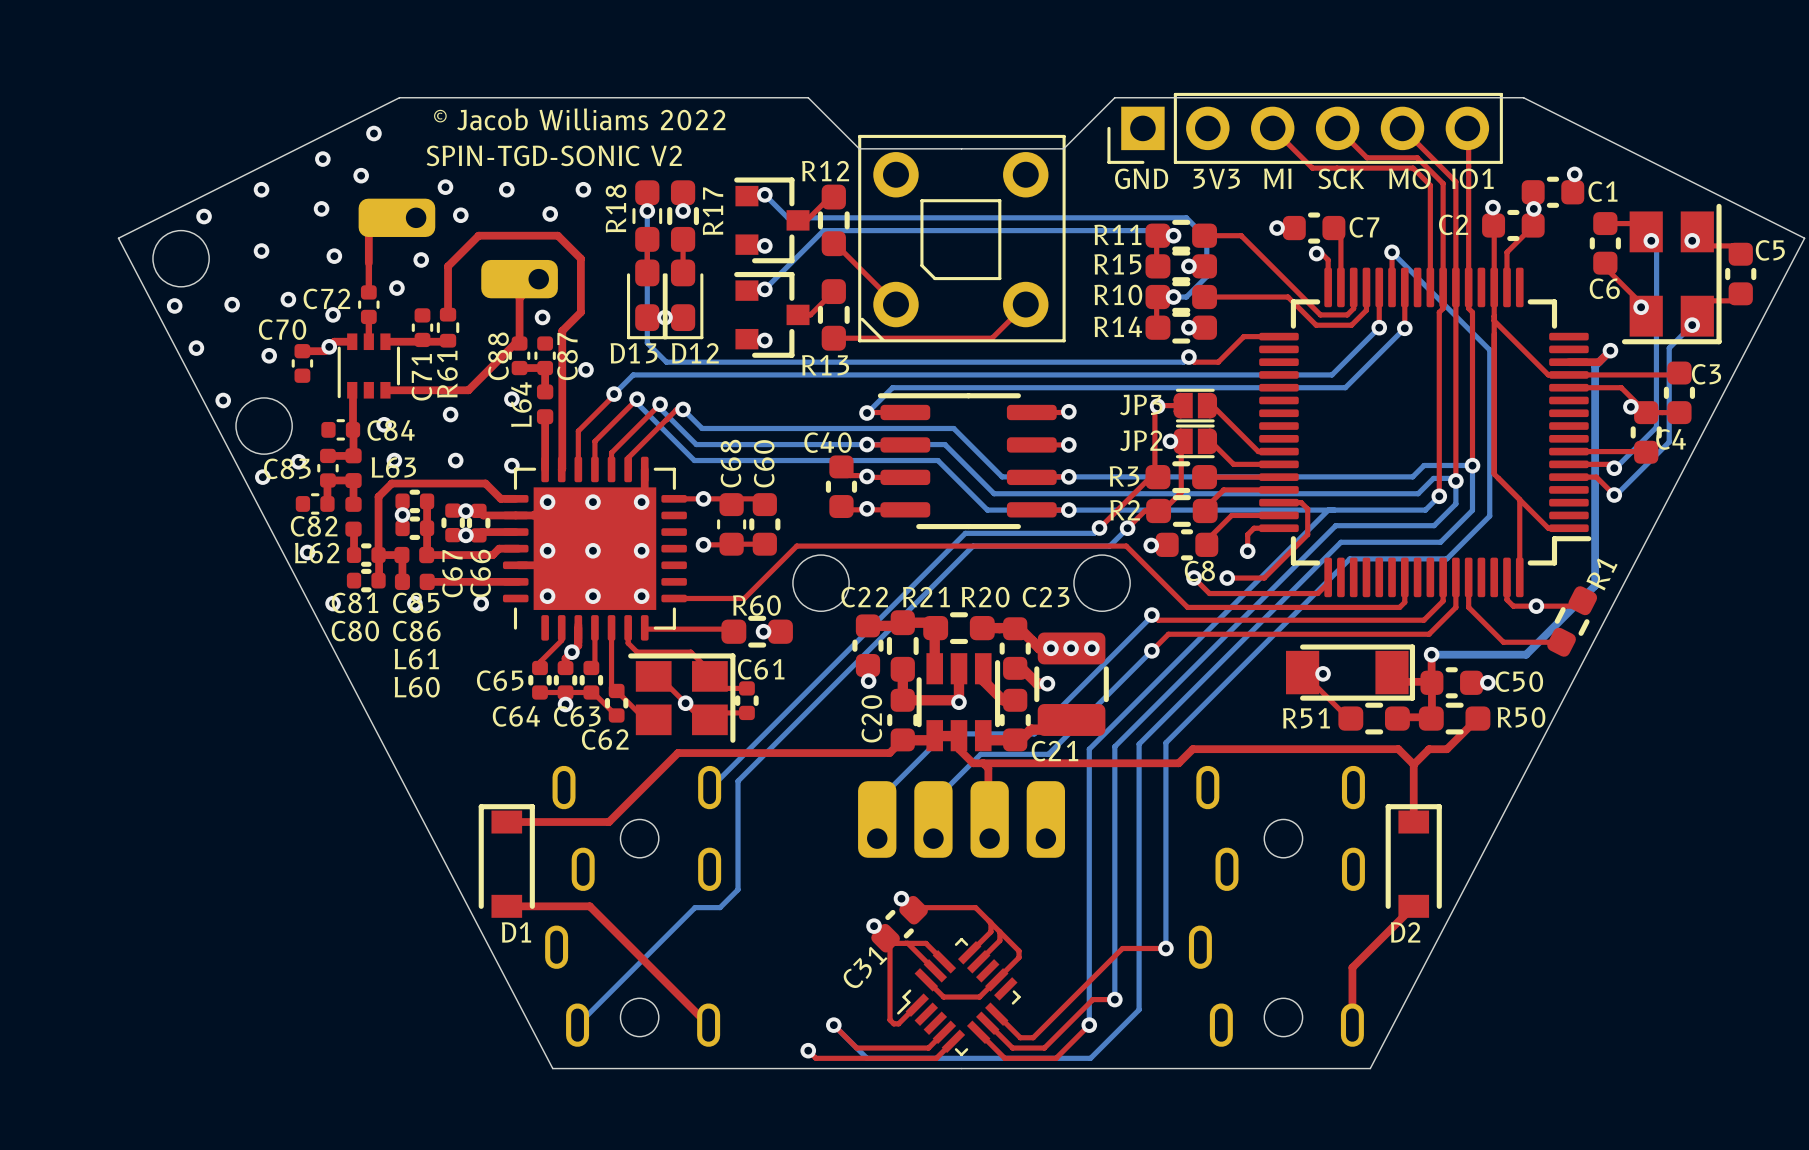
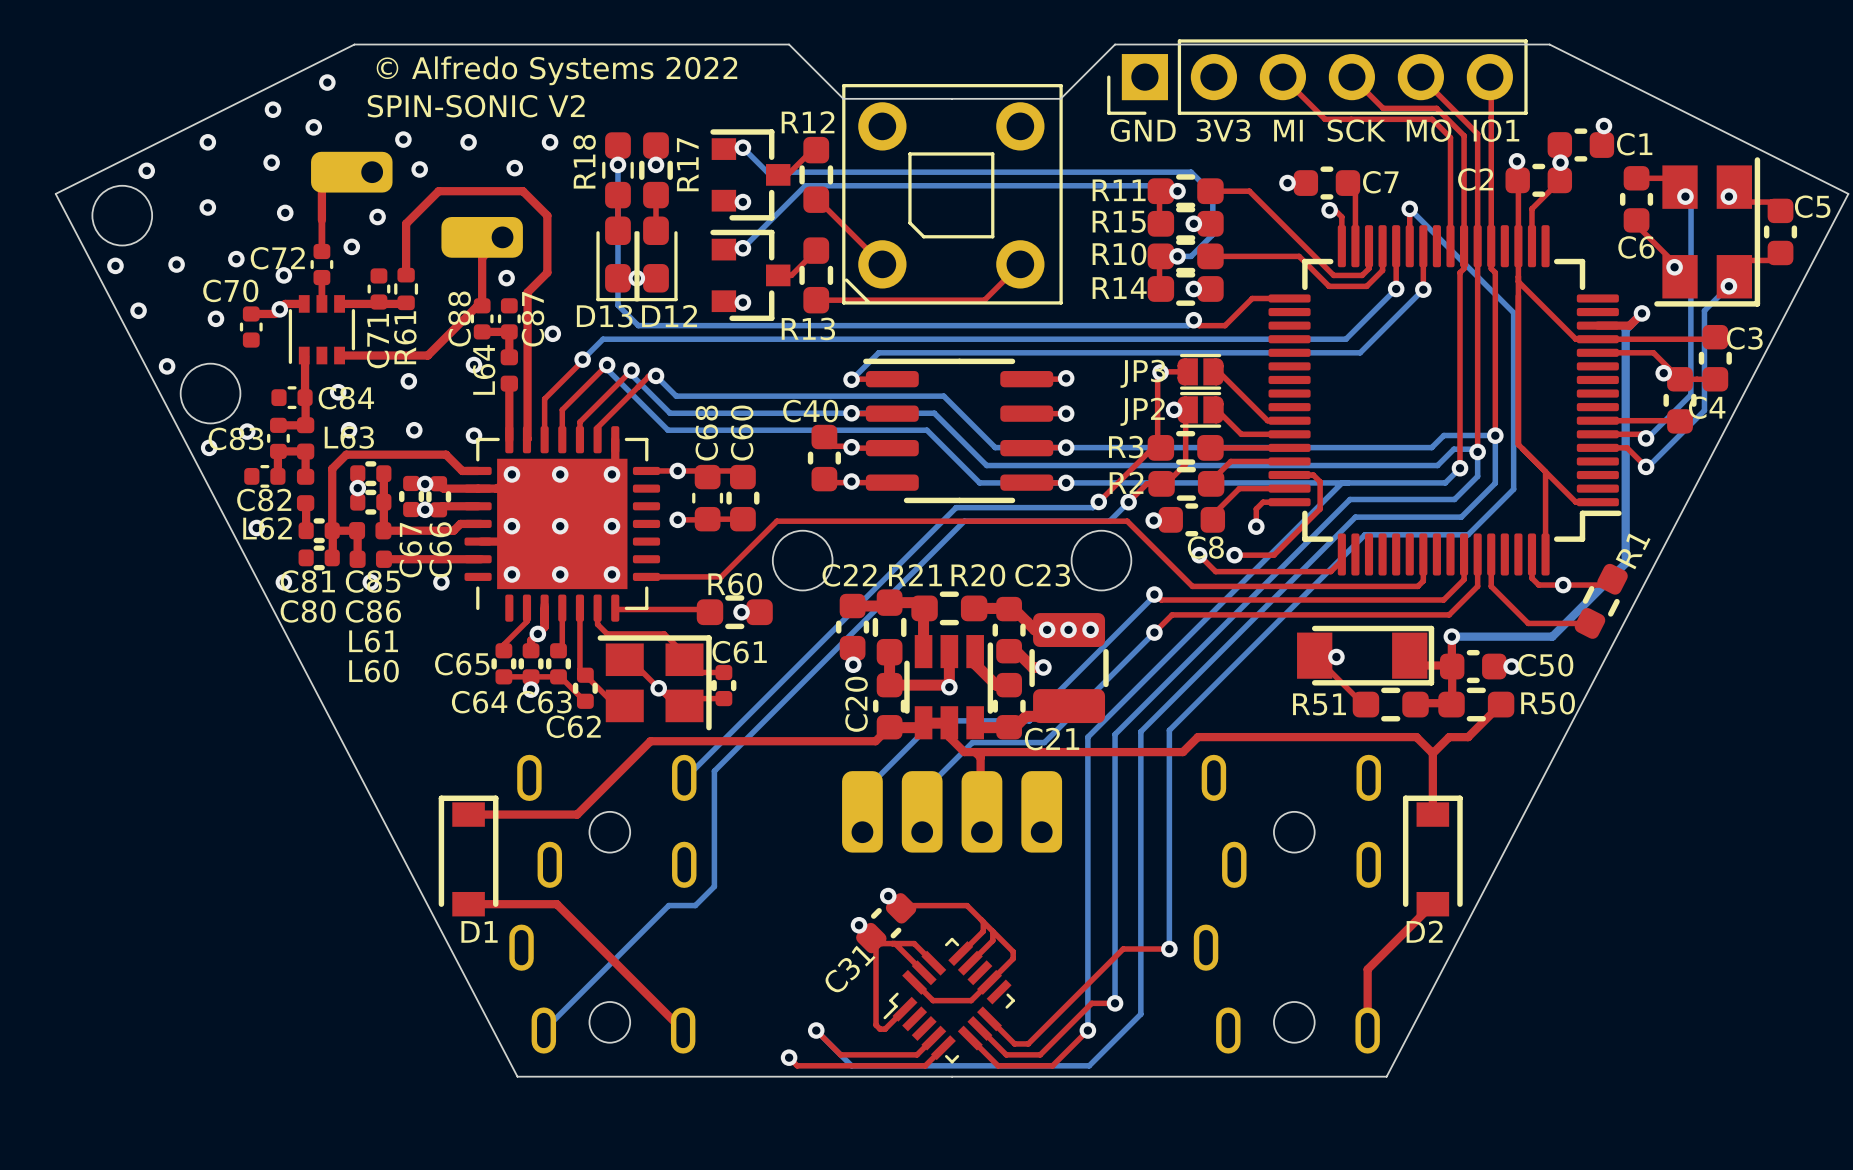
text: © Jacob Williams 2022 (579, 119) -> © Alfredo Systems 2022 (556, 70)
text: SPIN-TGD-SONIC V2 (554, 155) -> SPIN-SONIC V2 (476, 106)

